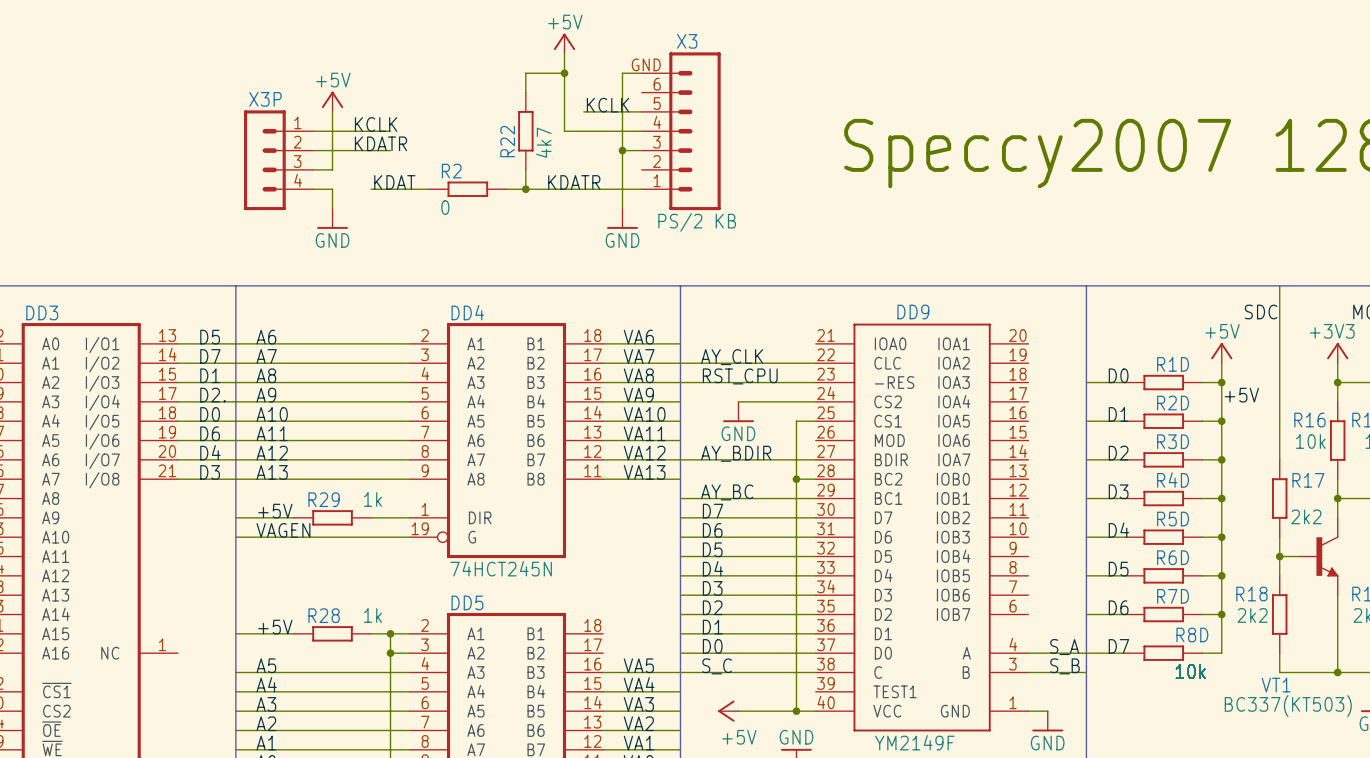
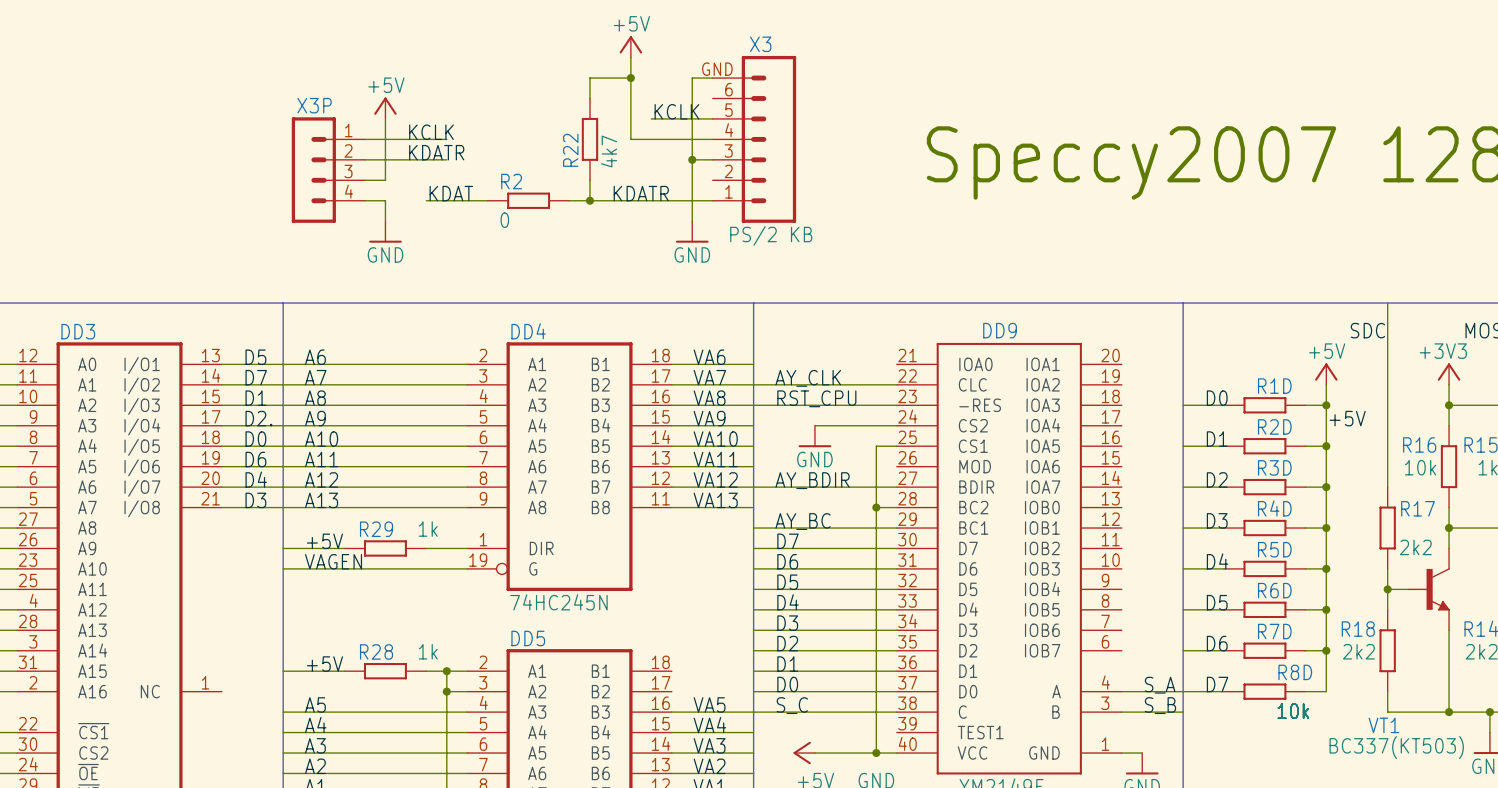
DD4 value: 74HCT245N (501, 568) -> 74HC245N (558, 602)

